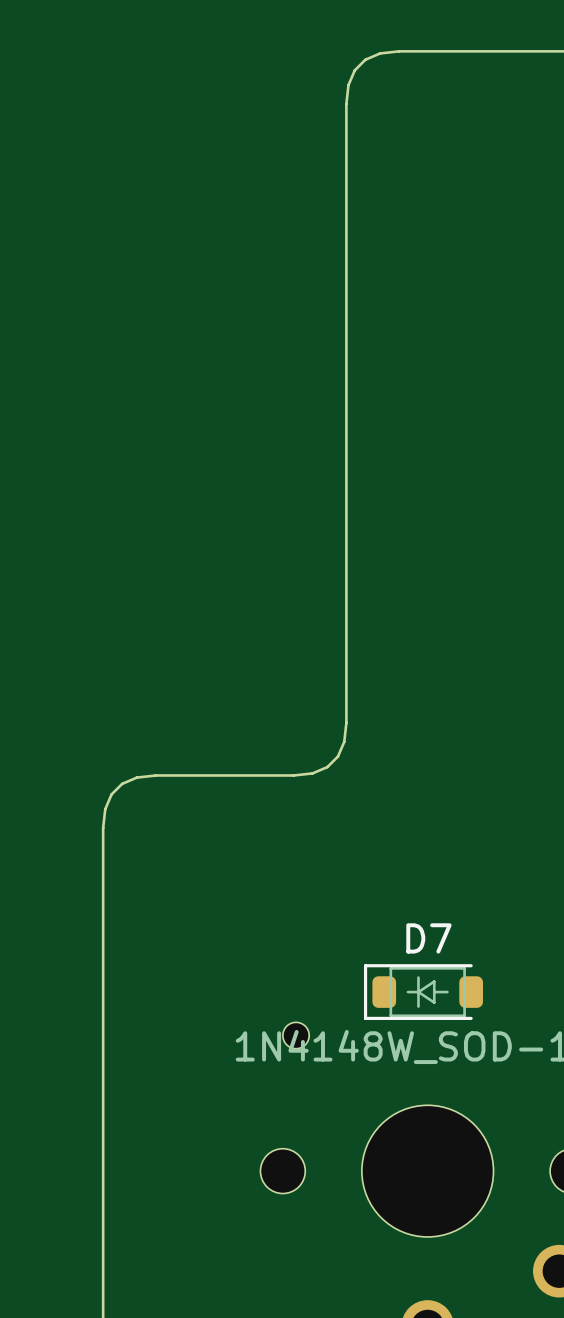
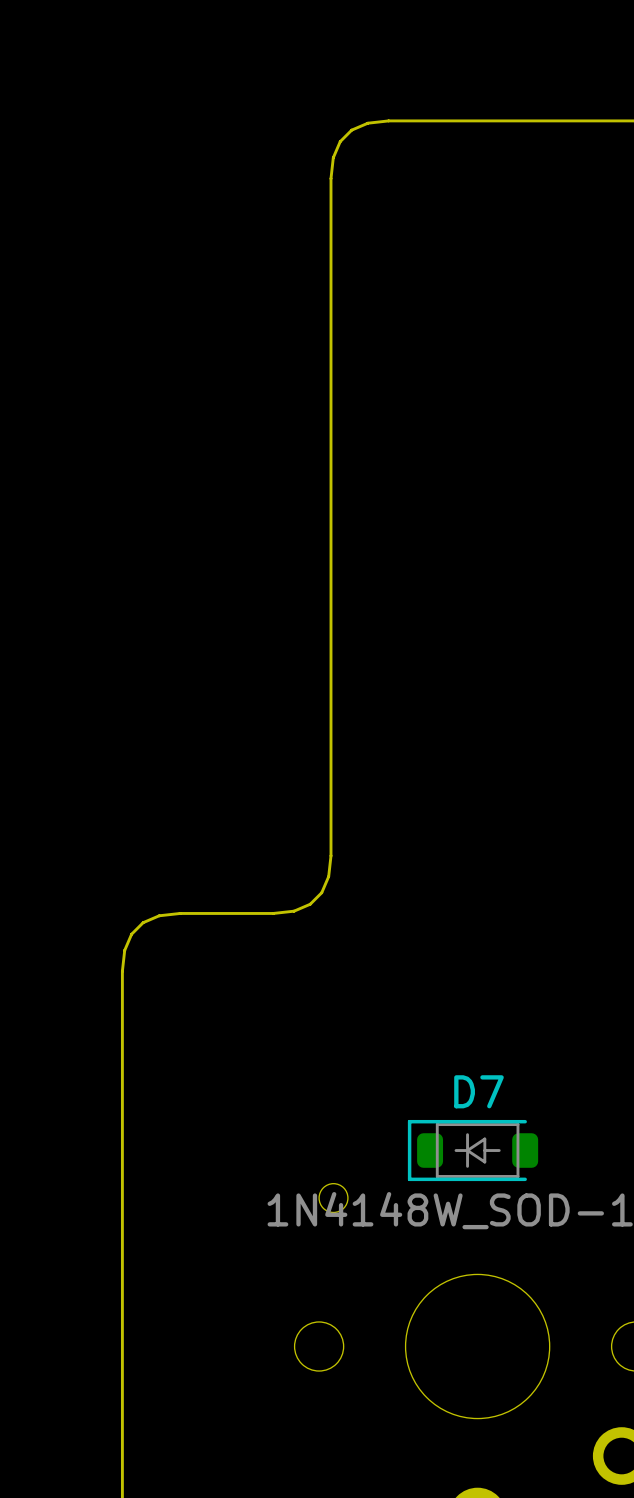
board edge: (399, 51) (380, 53) (365, 59) (354, 70) (348, 85) (346, 104) (346, 722) (344, 741) (337, 756) (327, 767) (312, 773) (293, 775) (241, 775) -> (446, 120) (388, 120) (367, 123) (351, 130) (340, 141) (333, 157) (331, 178) (331, 855) (328, 876) (321, 892) (310, 904) (294, 911) (273, 913)

